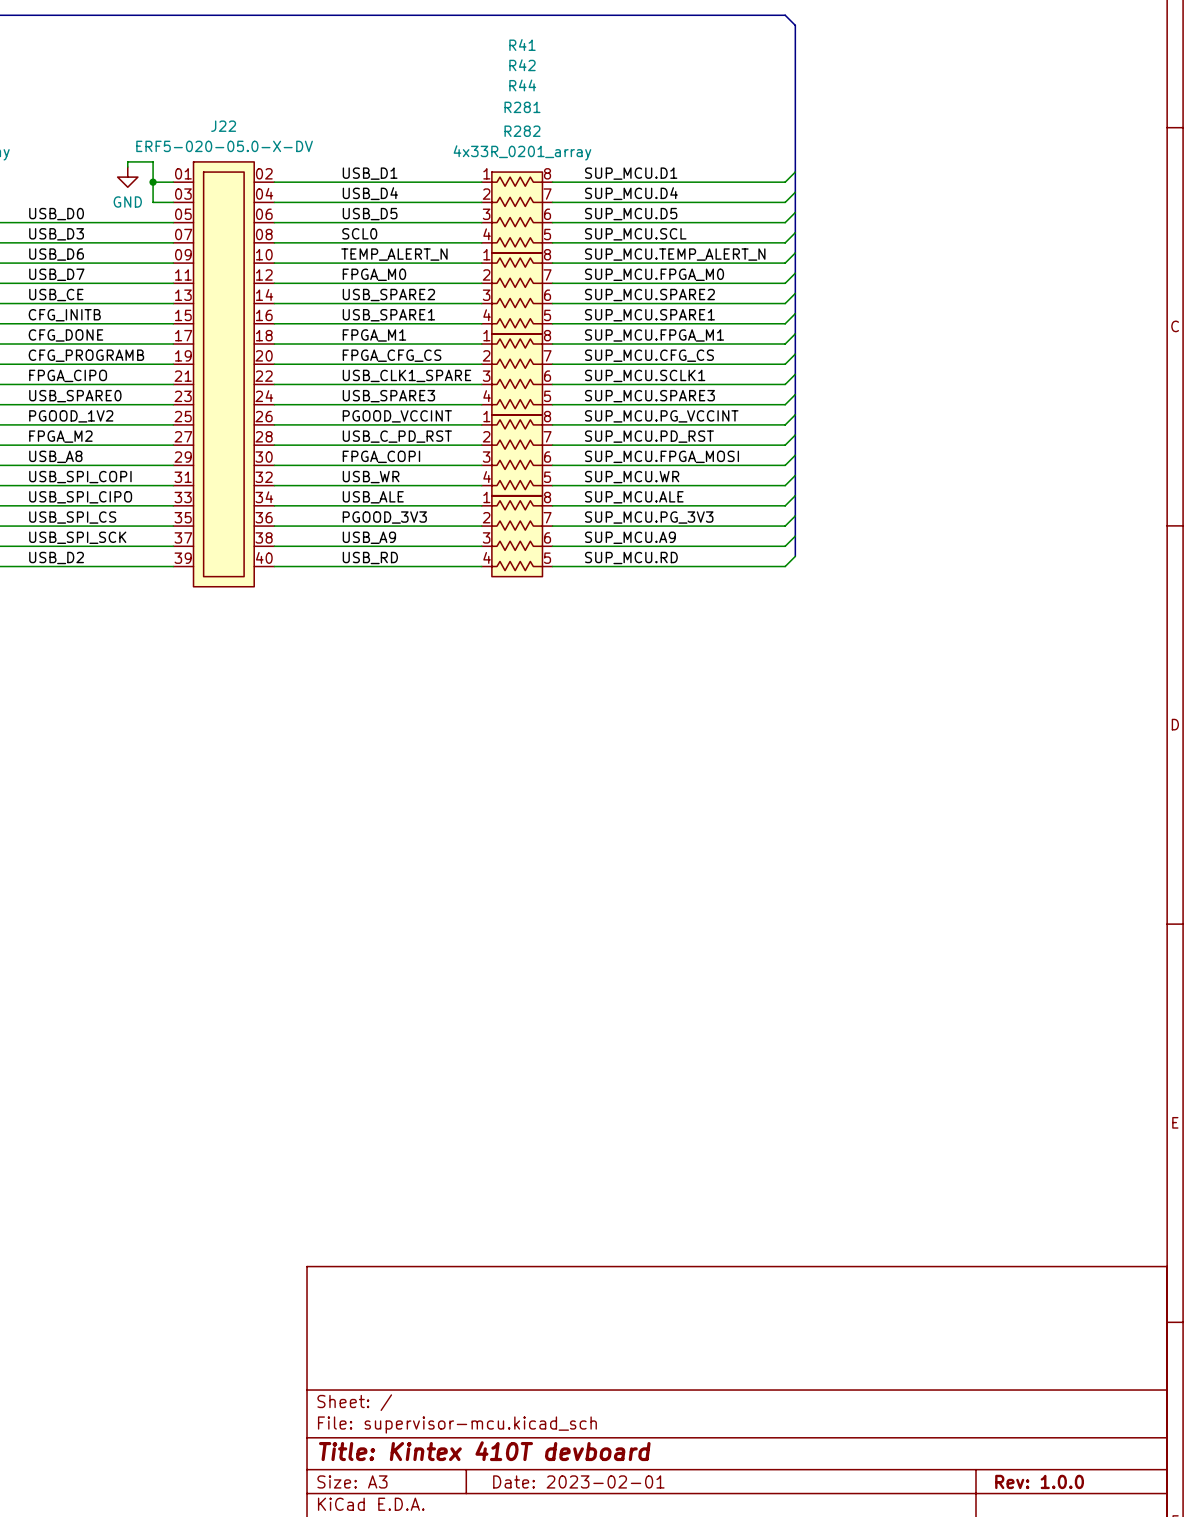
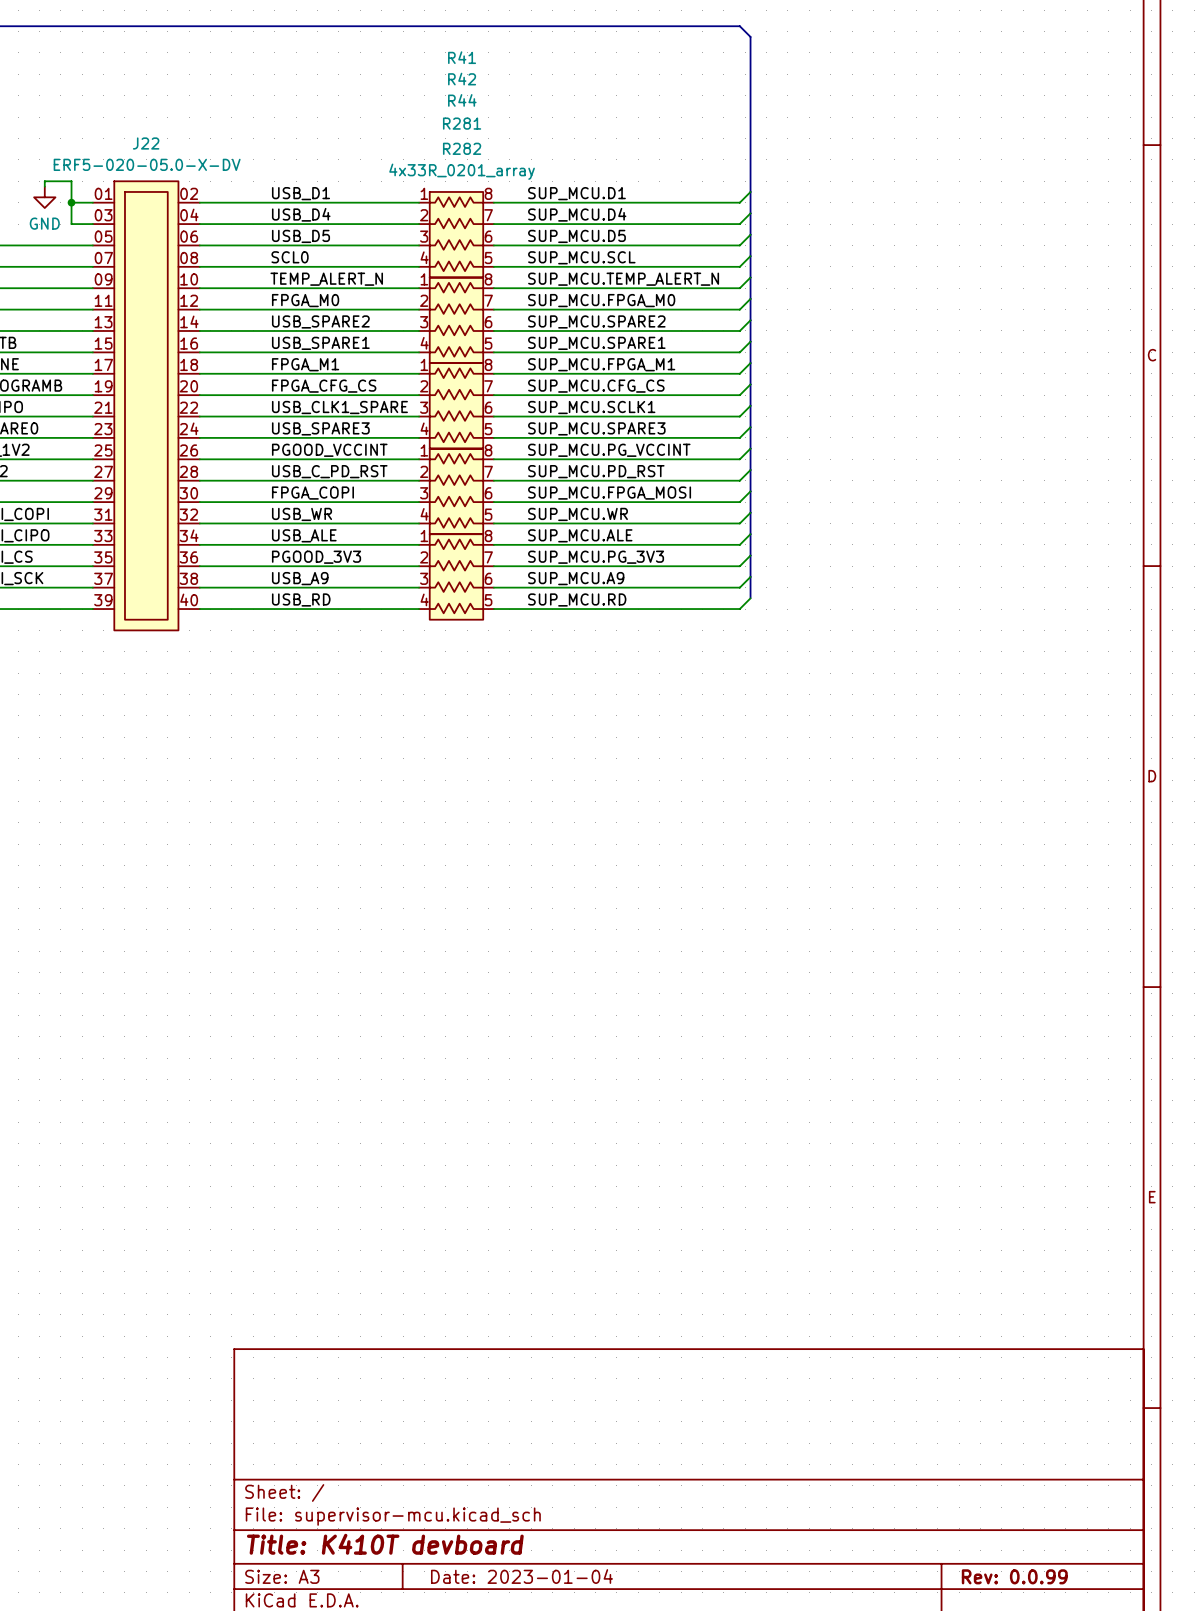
title block: Title: Kintex 410T devboard (484, 1451) -> Title: K410T devboard (385, 1544)
title block: Date: 2023-02-01 (578, 1481) -> Date: 2023-01-04 (521, 1576)
title block: Rev: 1.0.0 (1039, 1481) -> Rev: 0.0.99 (1014, 1576)

